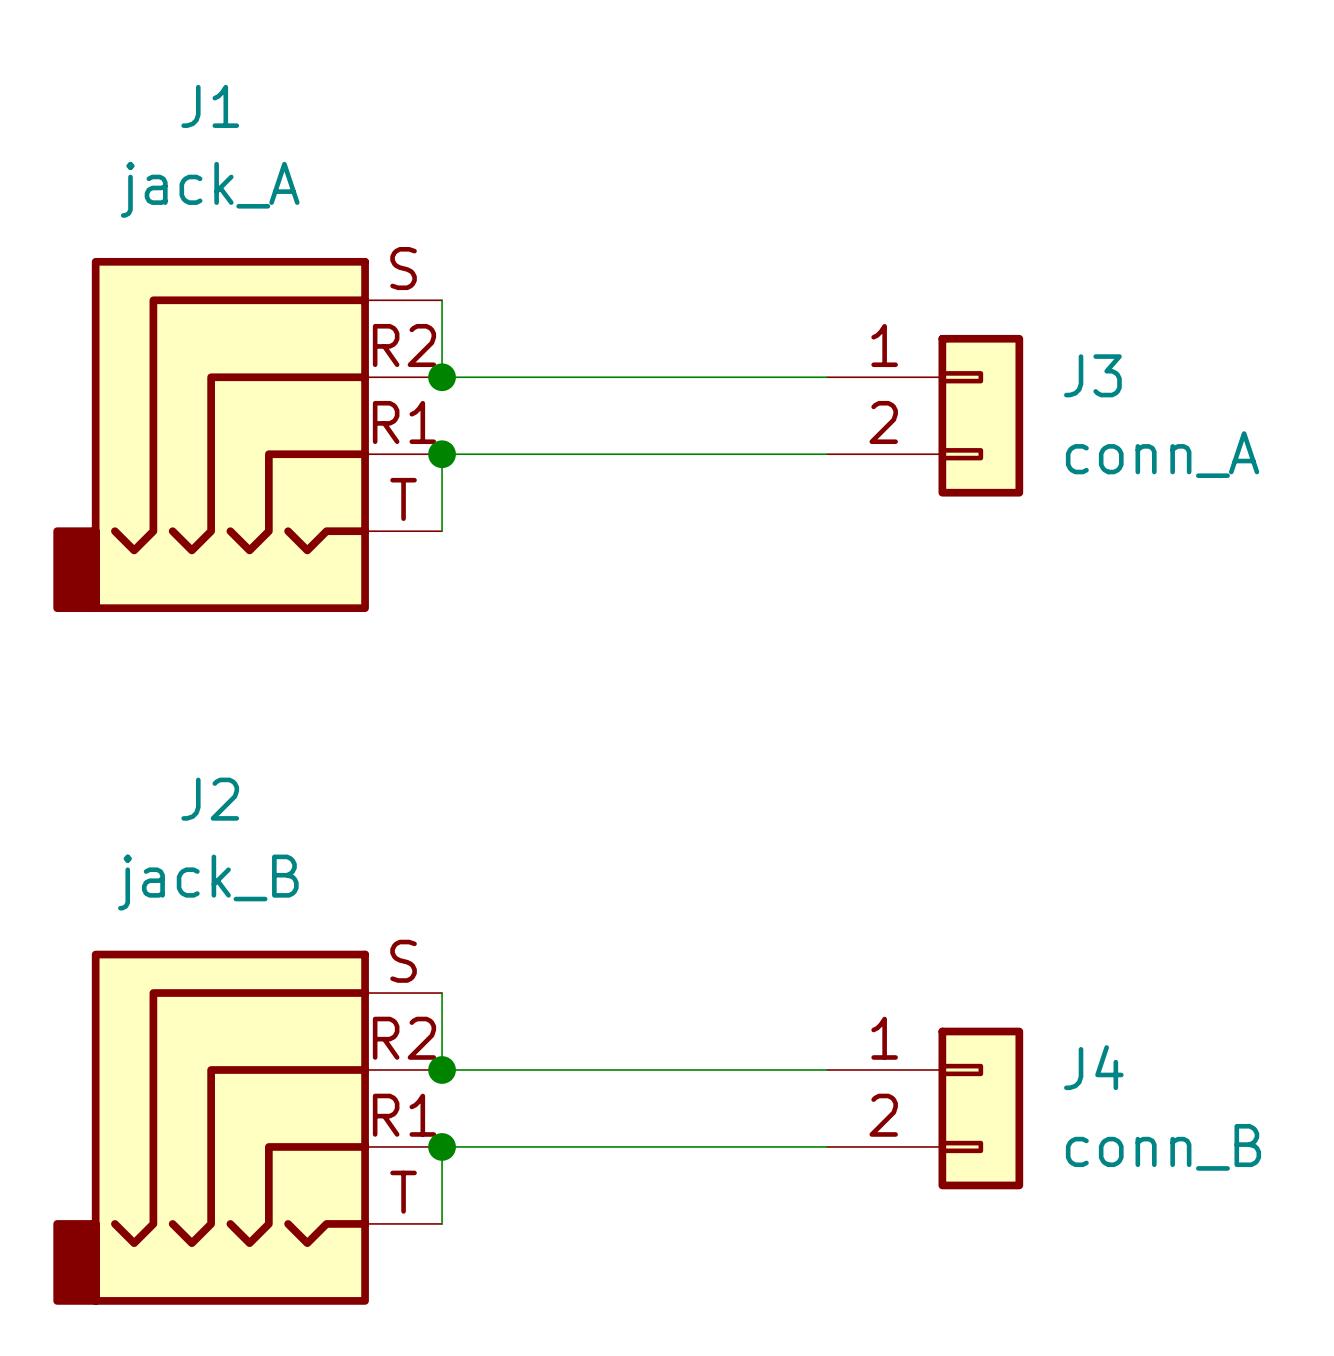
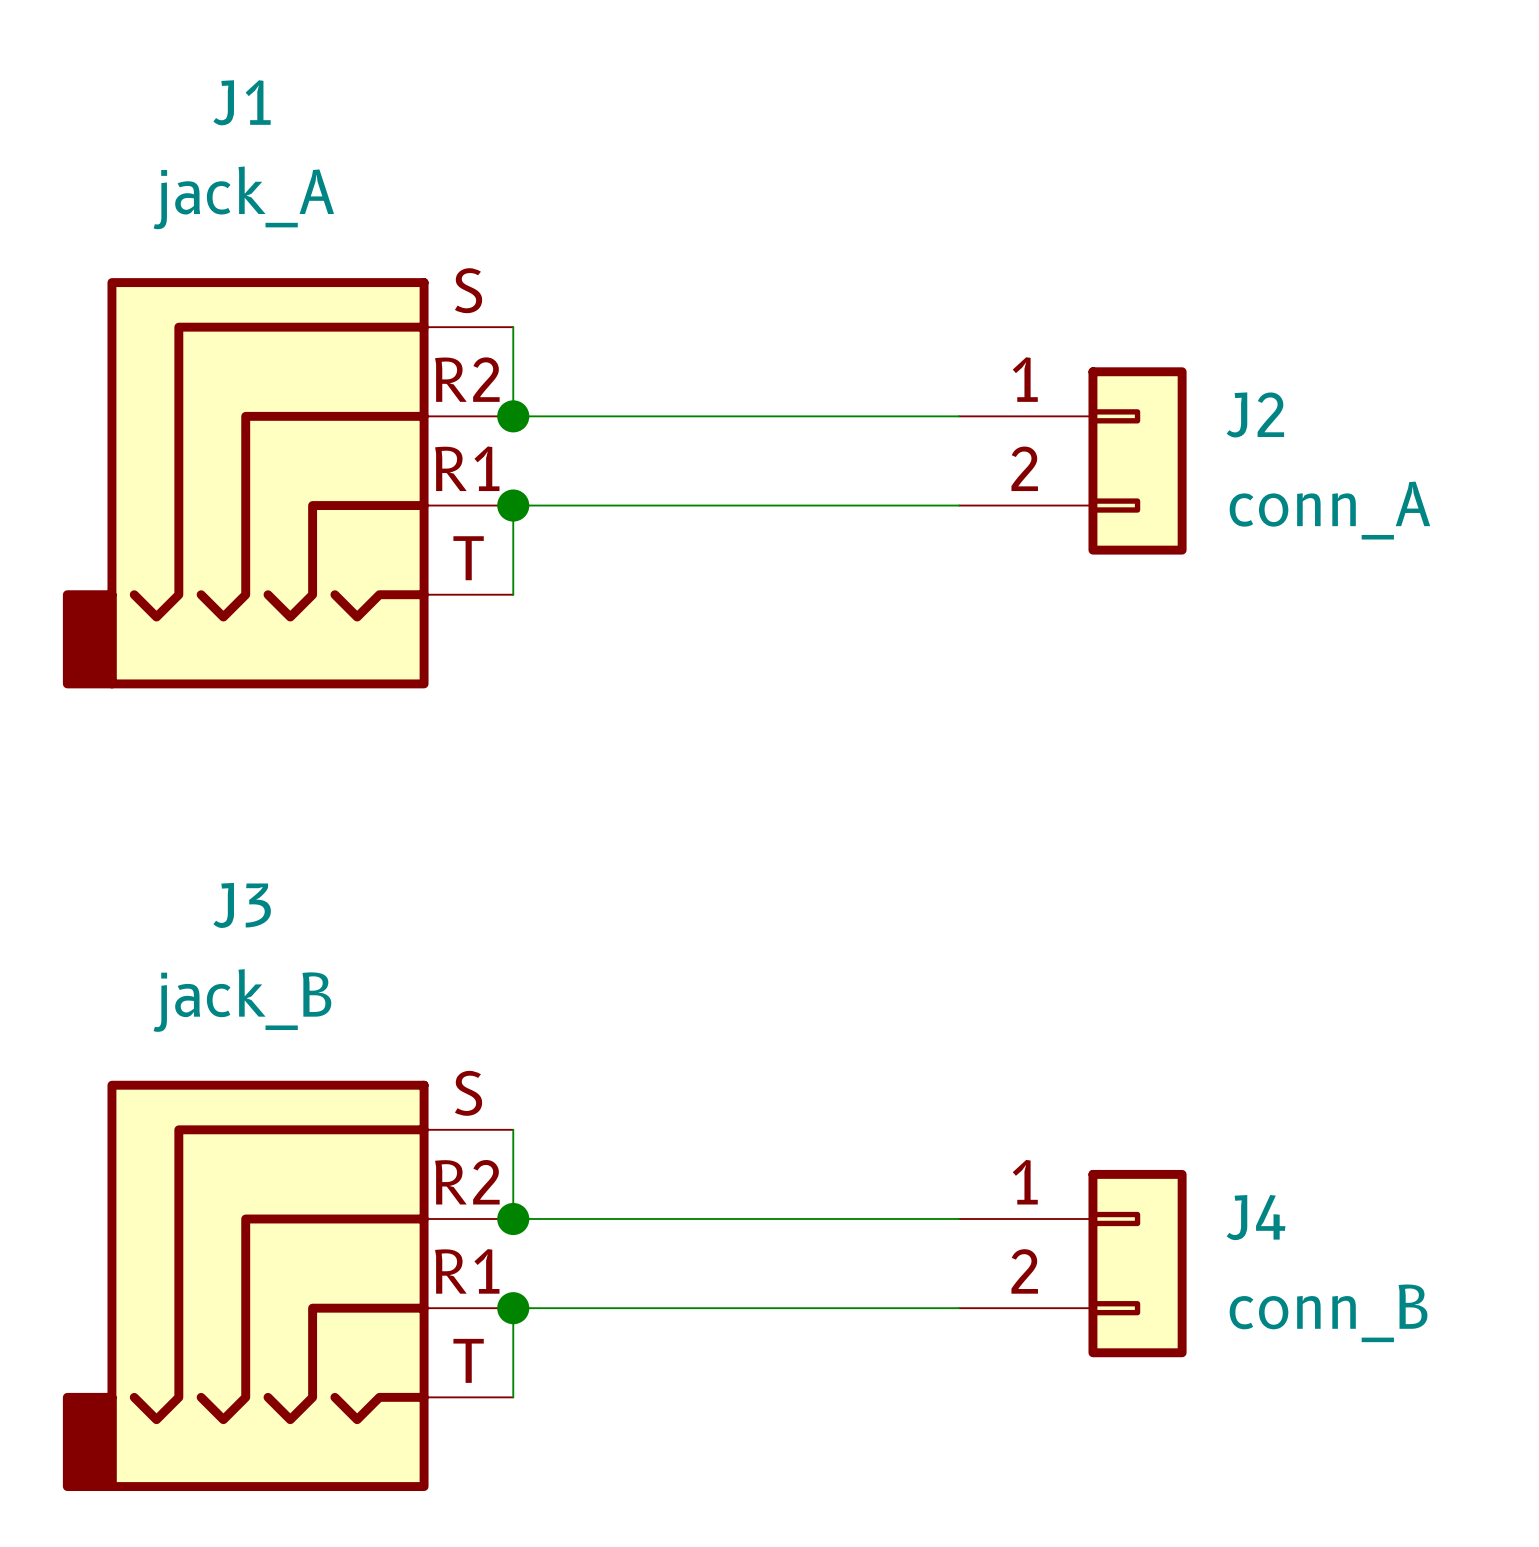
J3 name: J3 (1092, 375) -> J2 (1255, 414)
J2 name: J2 (210, 799) -> J3 (242, 905)

